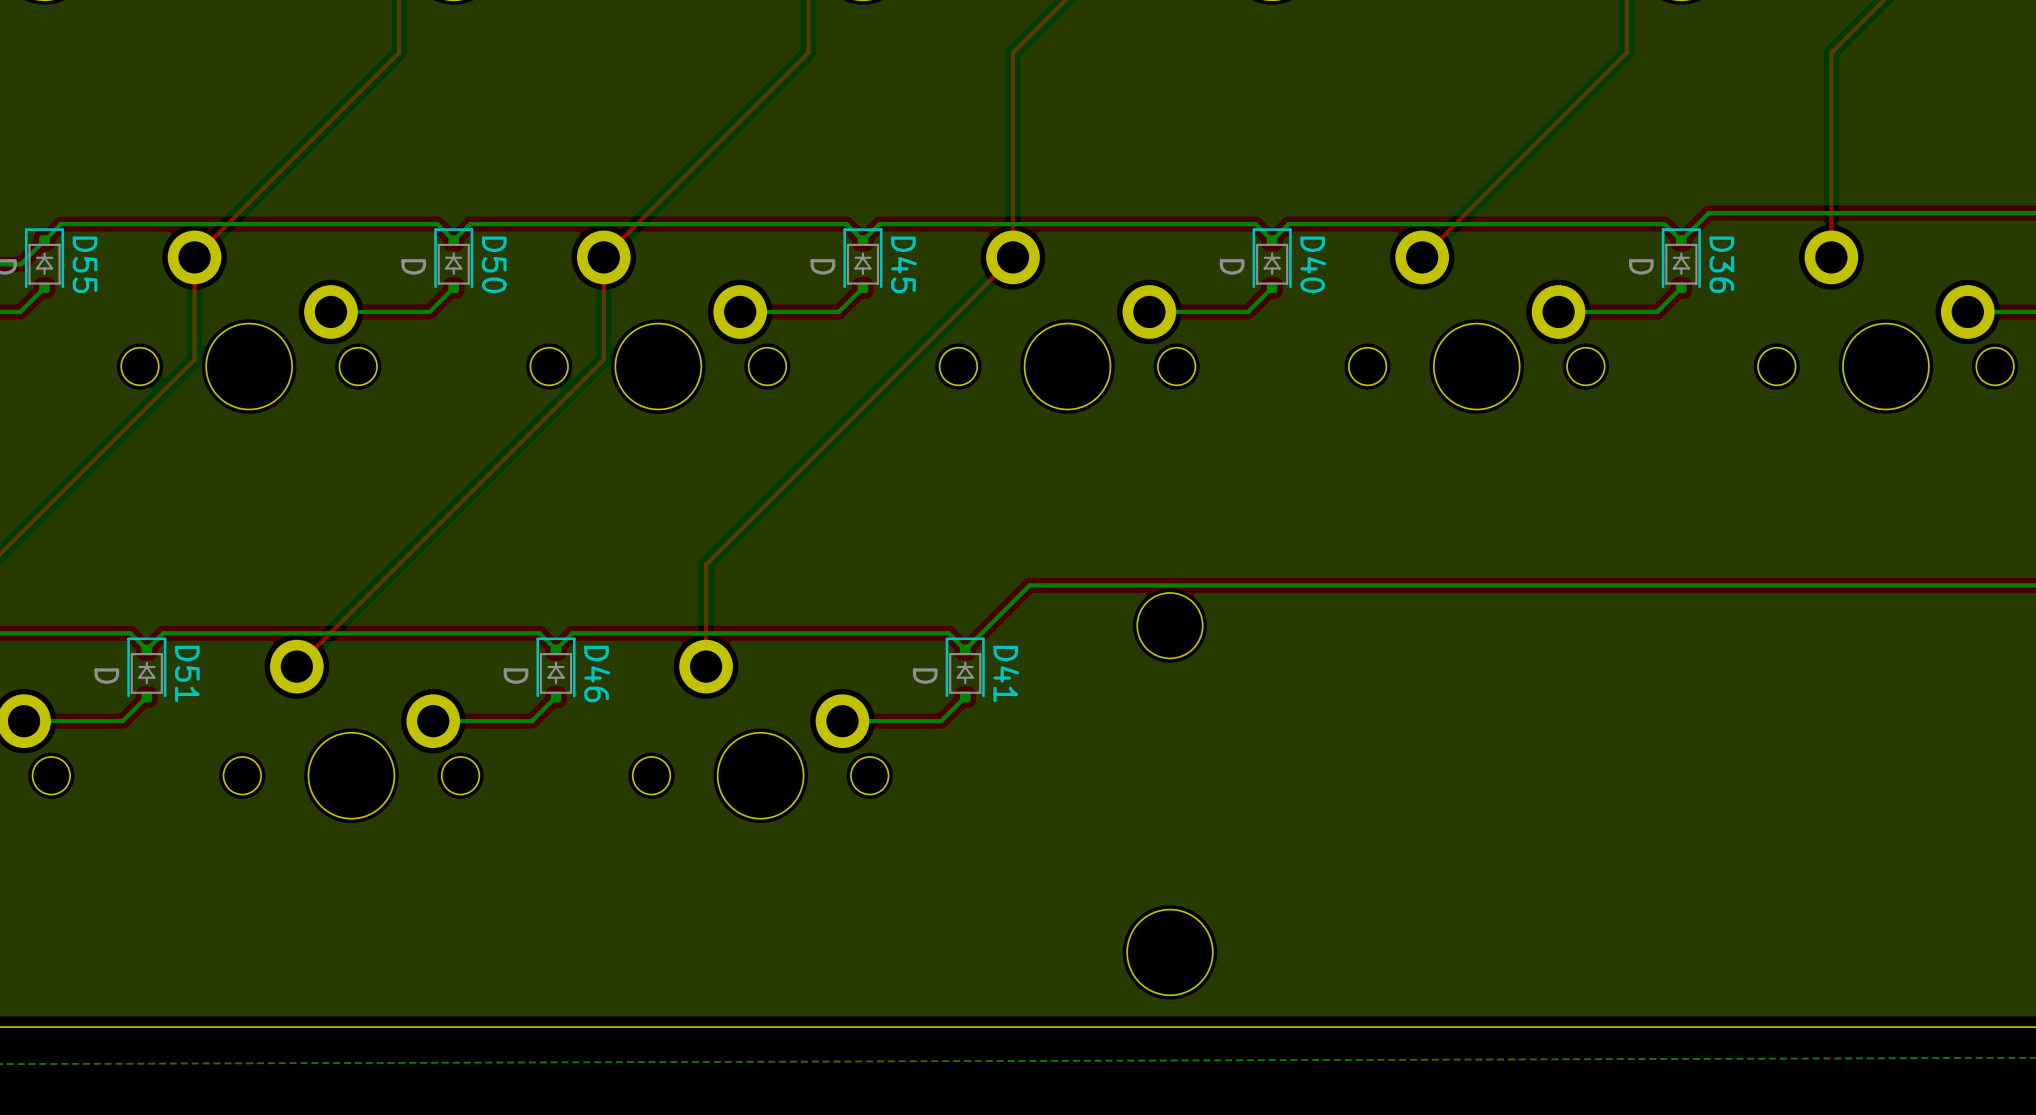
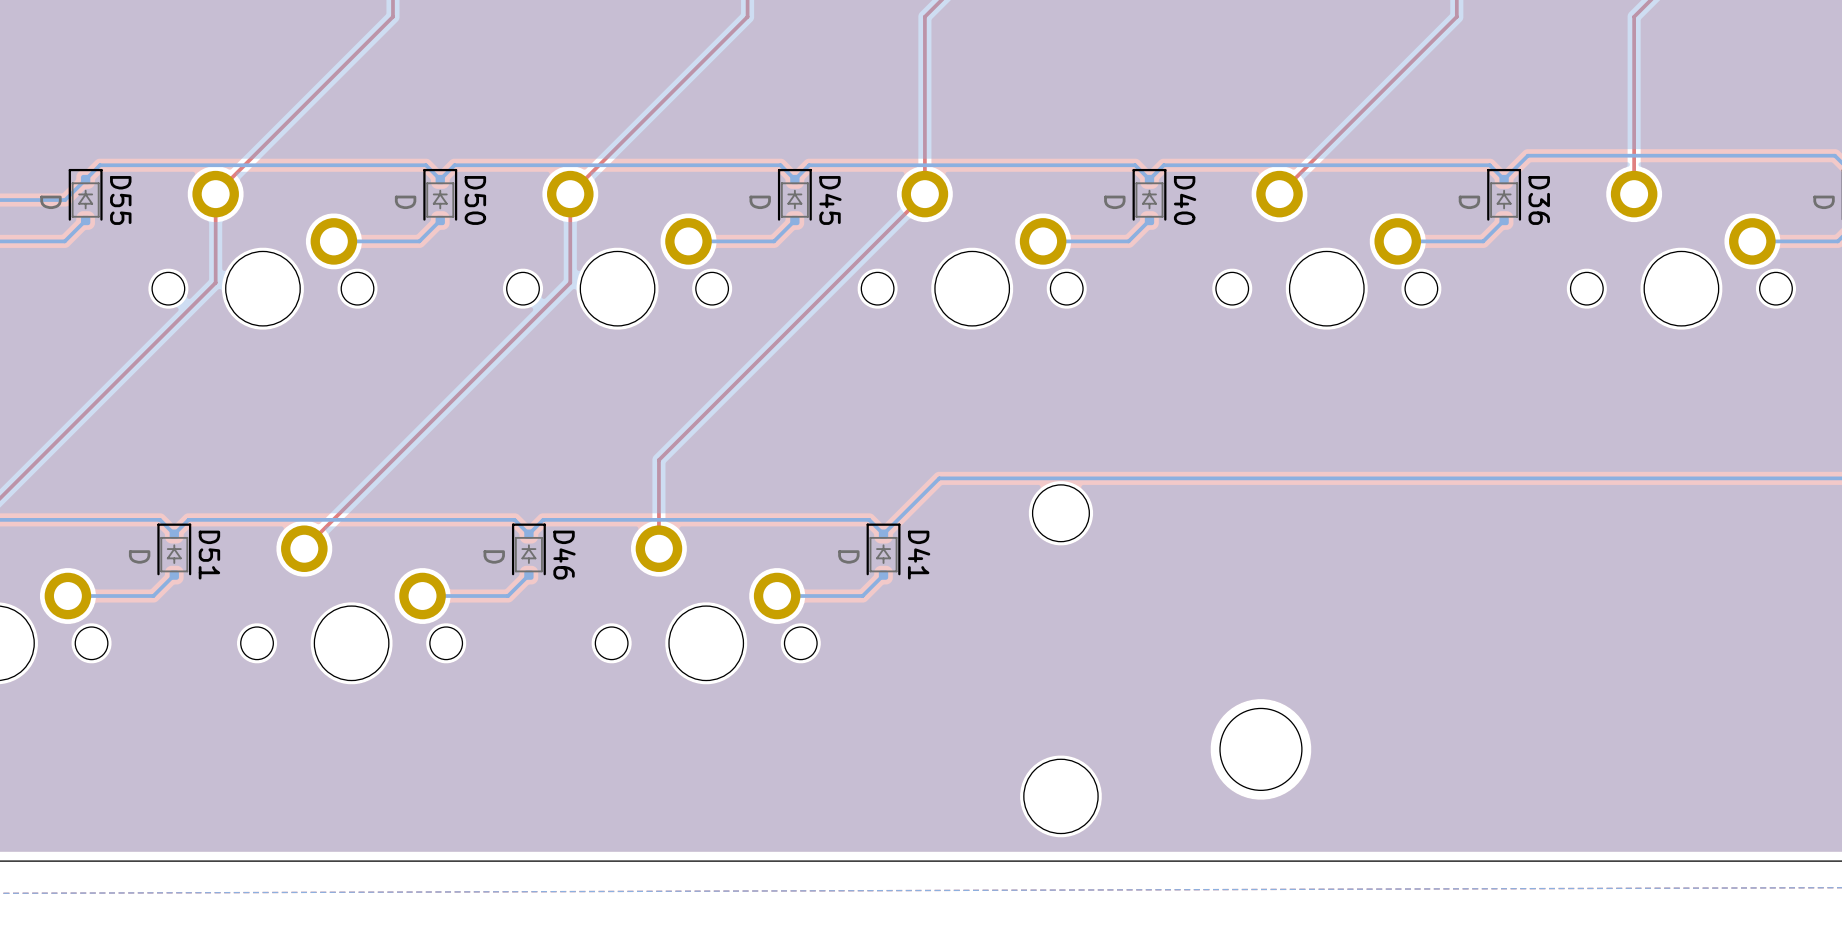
round board edge: none -> [1219, 707, 1303, 791]

